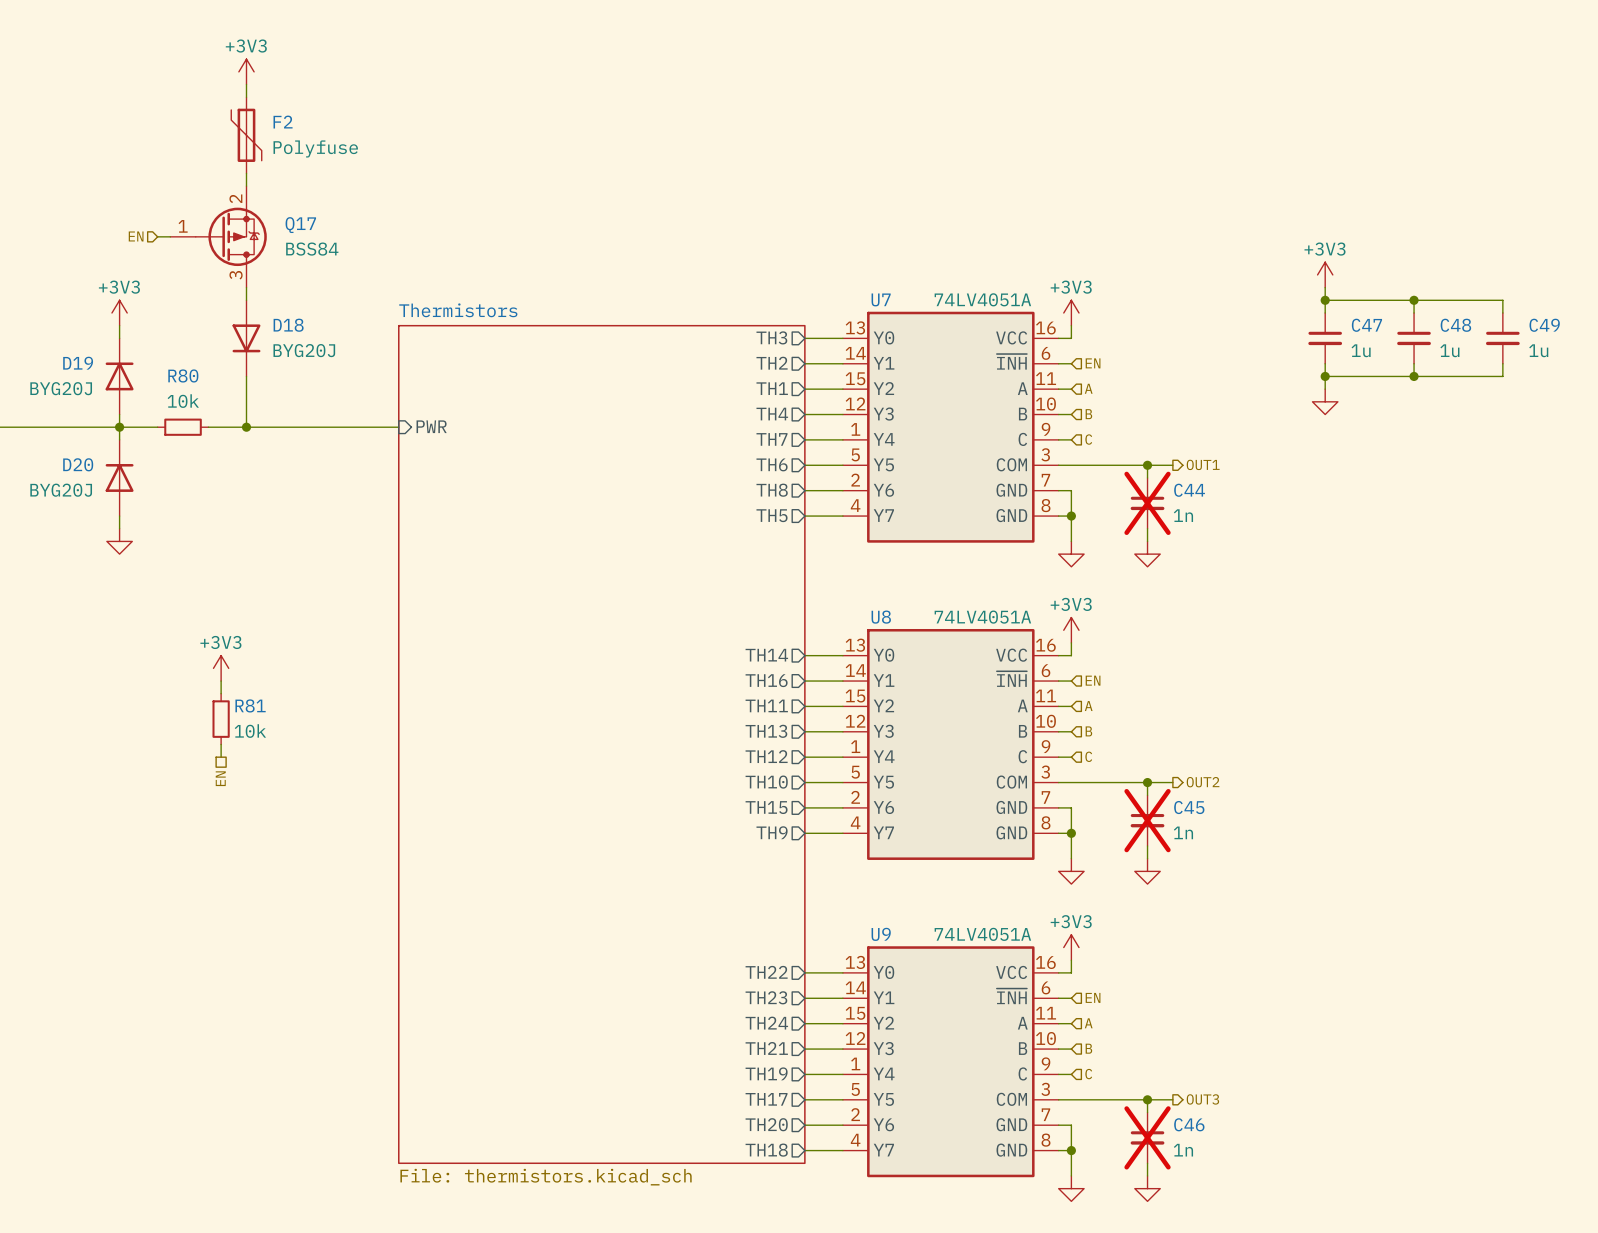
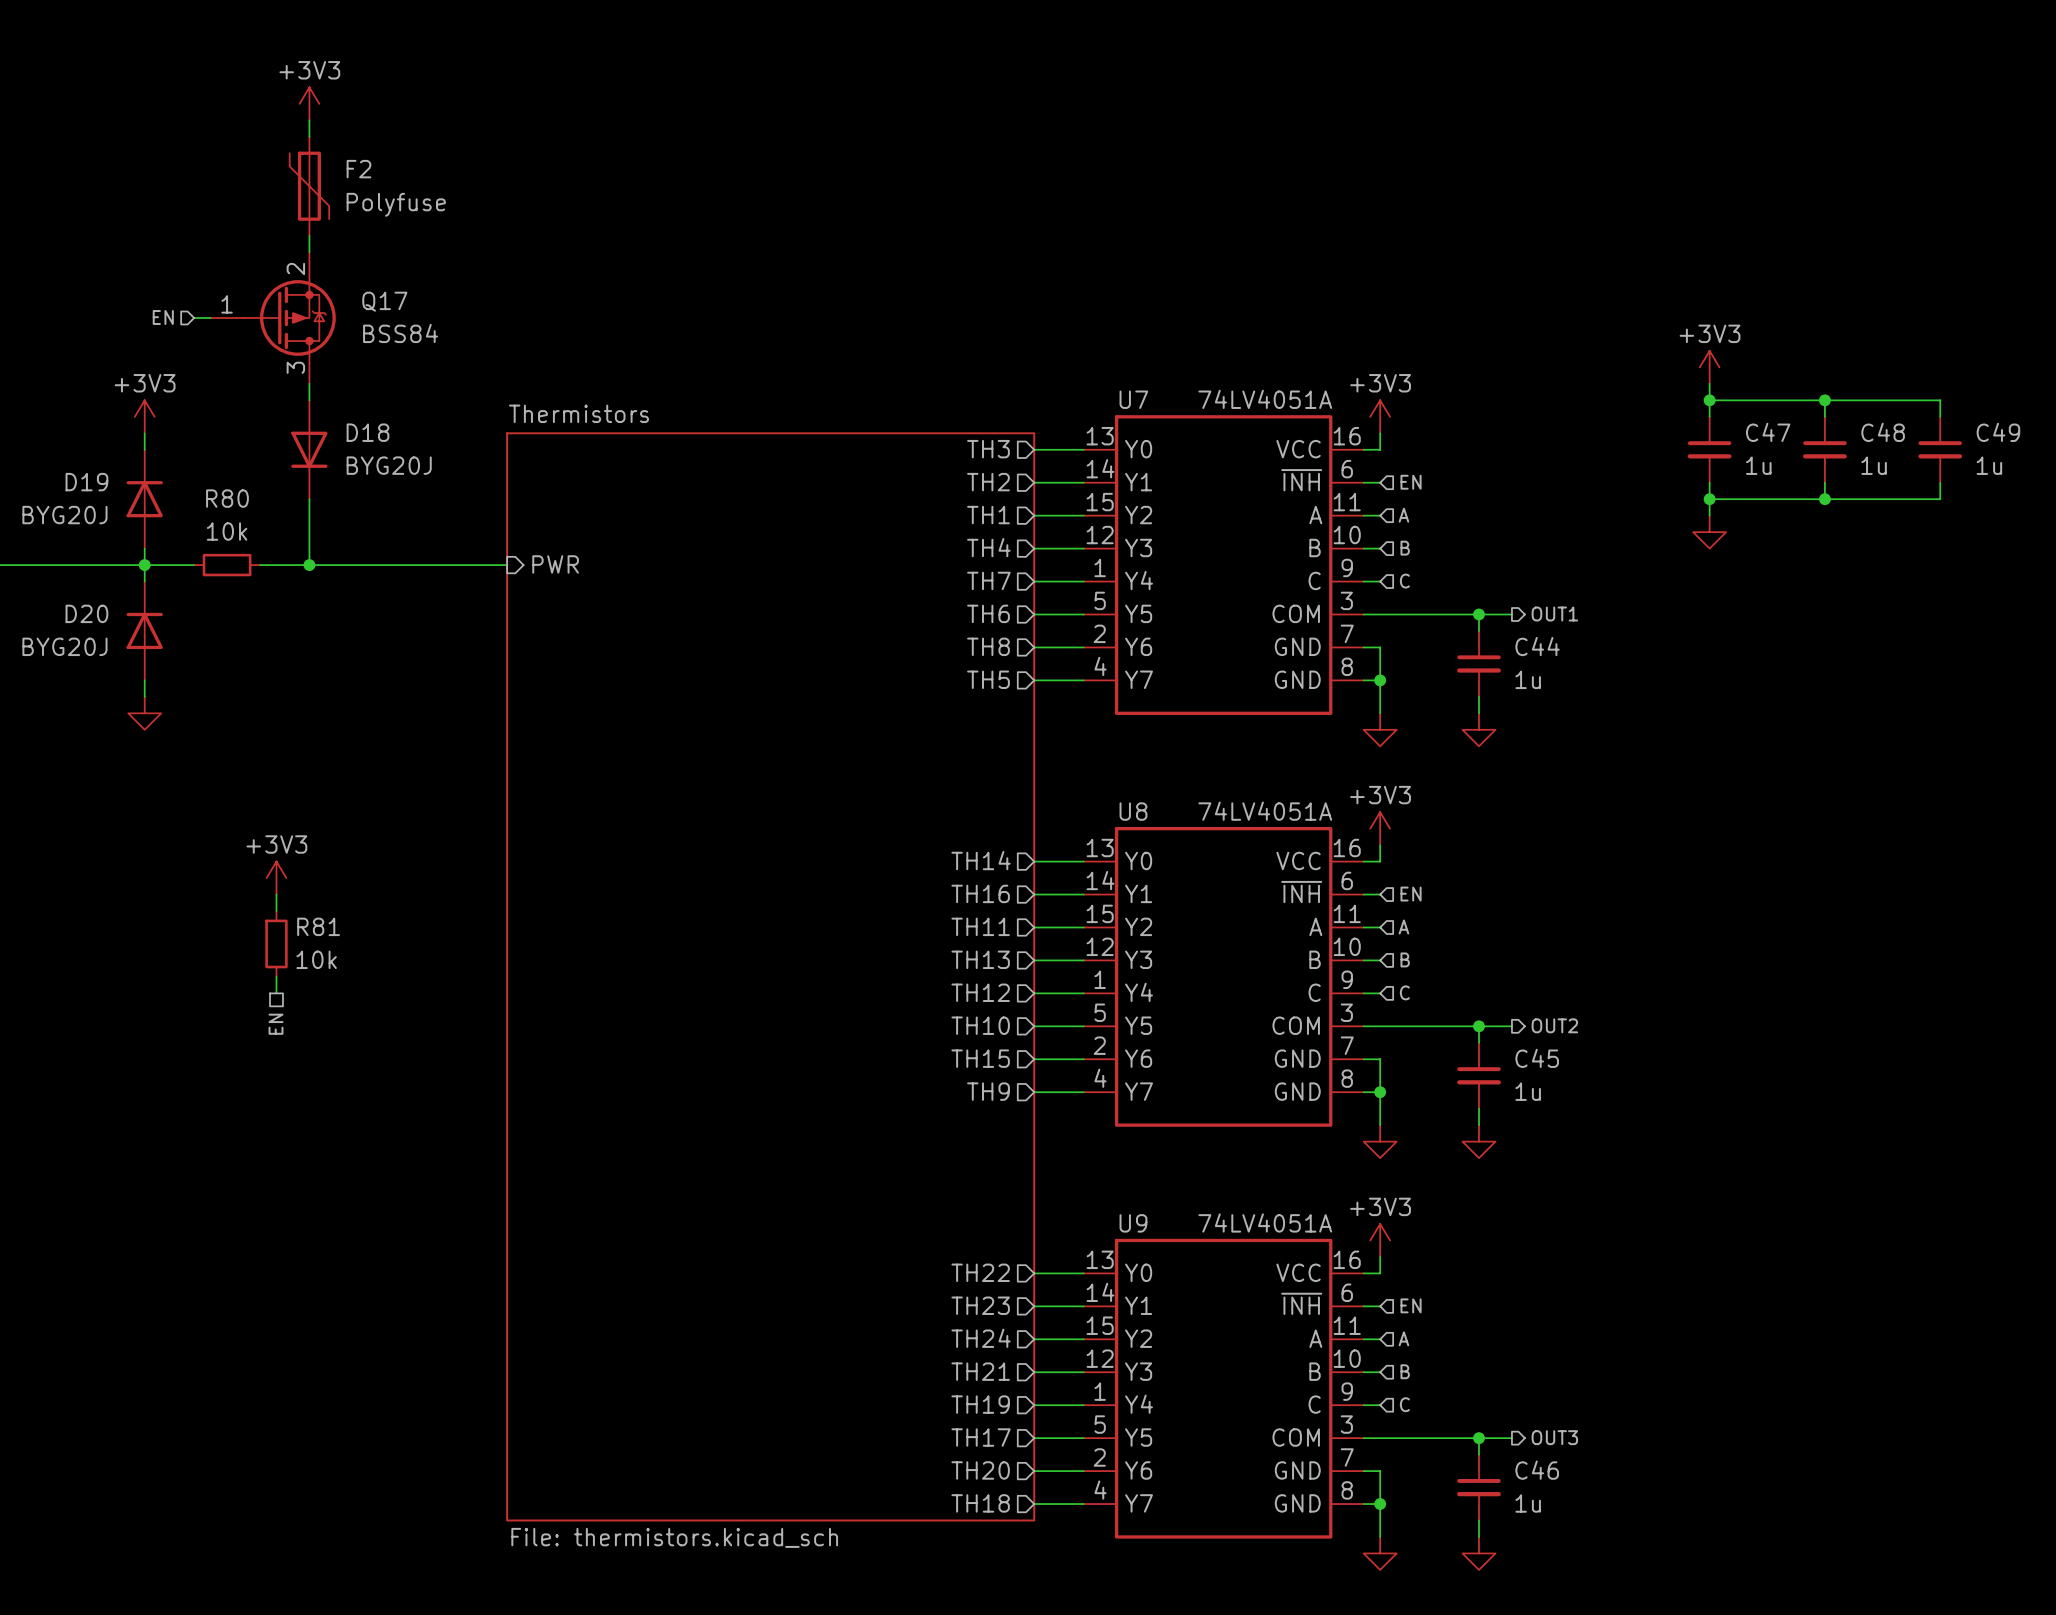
C44 do-not-place cross: (1147, 503) -> none
C44 value: 1n (1183, 515) -> 1u (1528, 679)
C45 do-not-place cross: (1147, 820) -> none
C45 value: 1n (1183, 832) -> 1u (1528, 1091)
C46 do-not-place cross: (1147, 1137) -> none
C46 value: 1n (1183, 1150) -> 1u (1528, 1503)

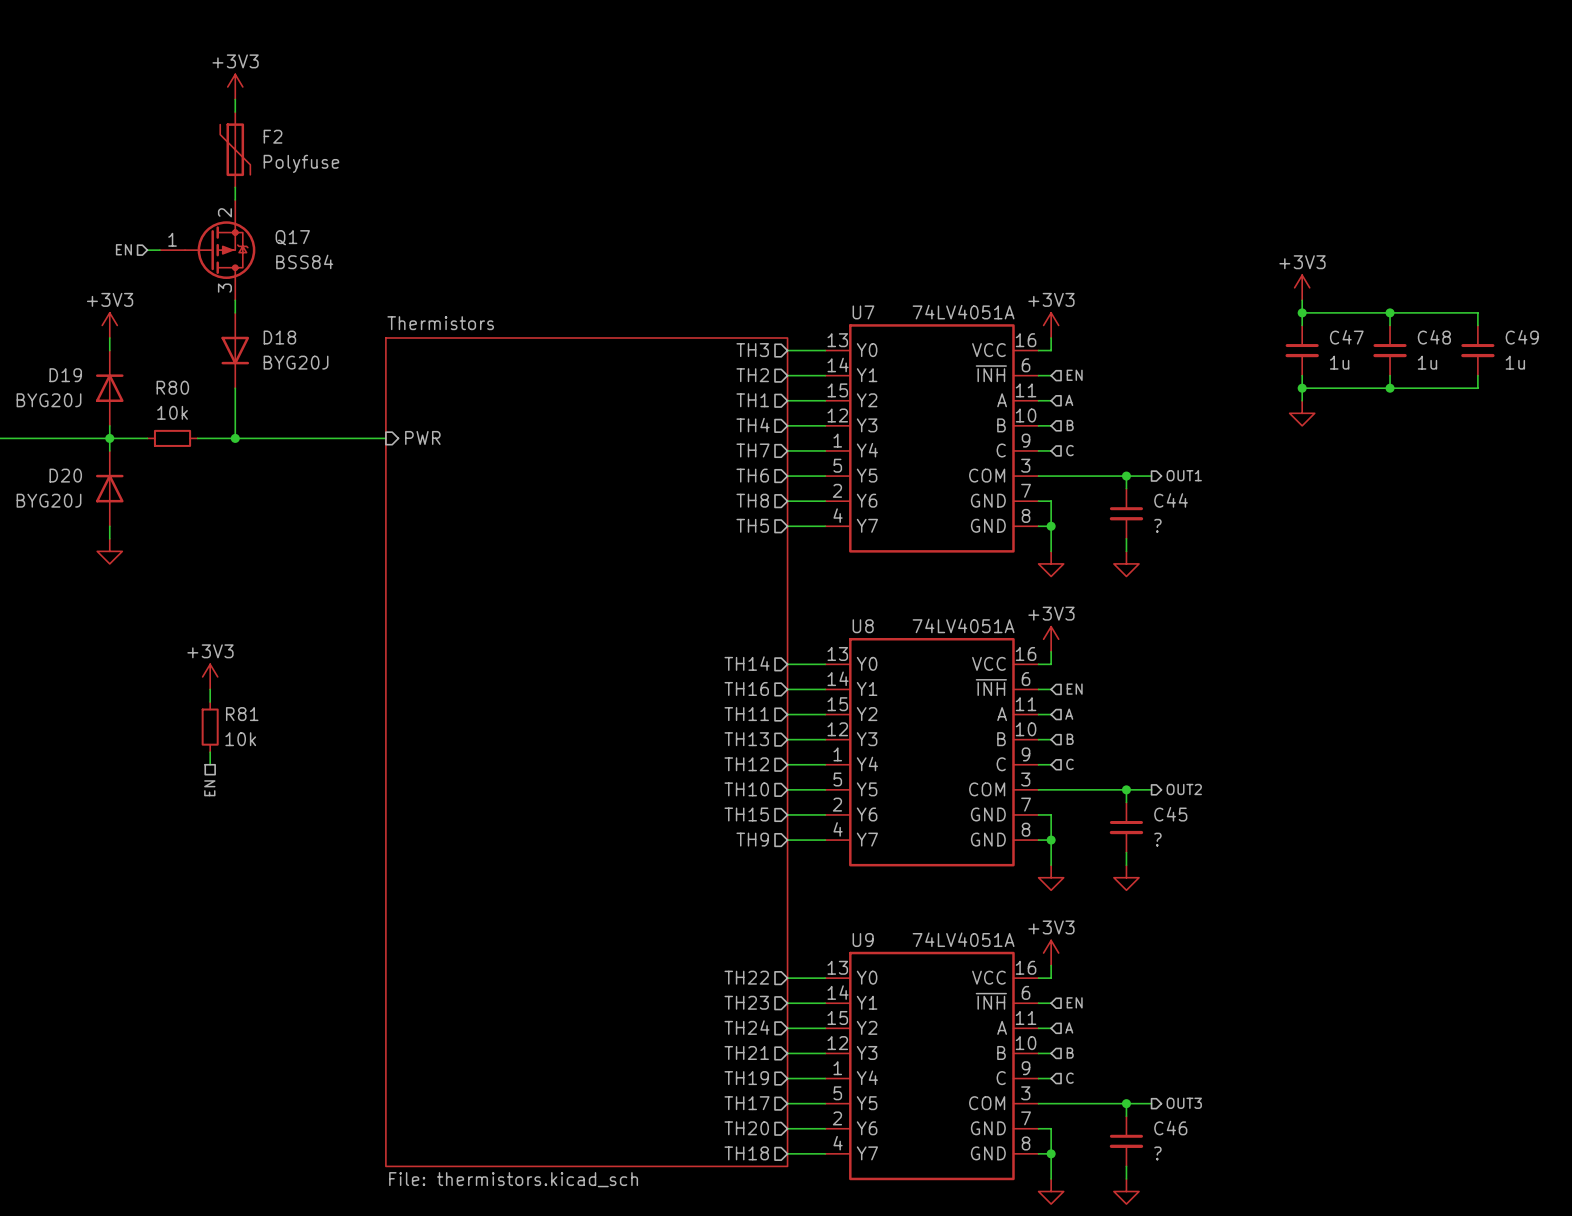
C44 value: 1u (1528, 679) -> ? (1157, 525)
C45 value: 1u (1528, 1091) -> ? (1157, 839)
C46 value: 1u (1528, 1503) -> ? (1157, 1153)

